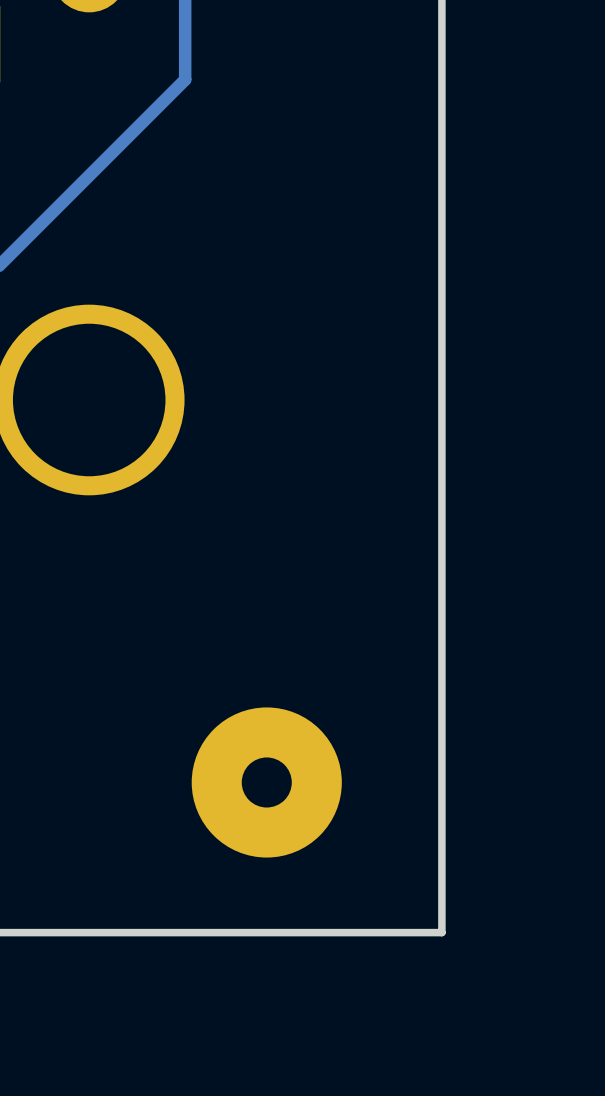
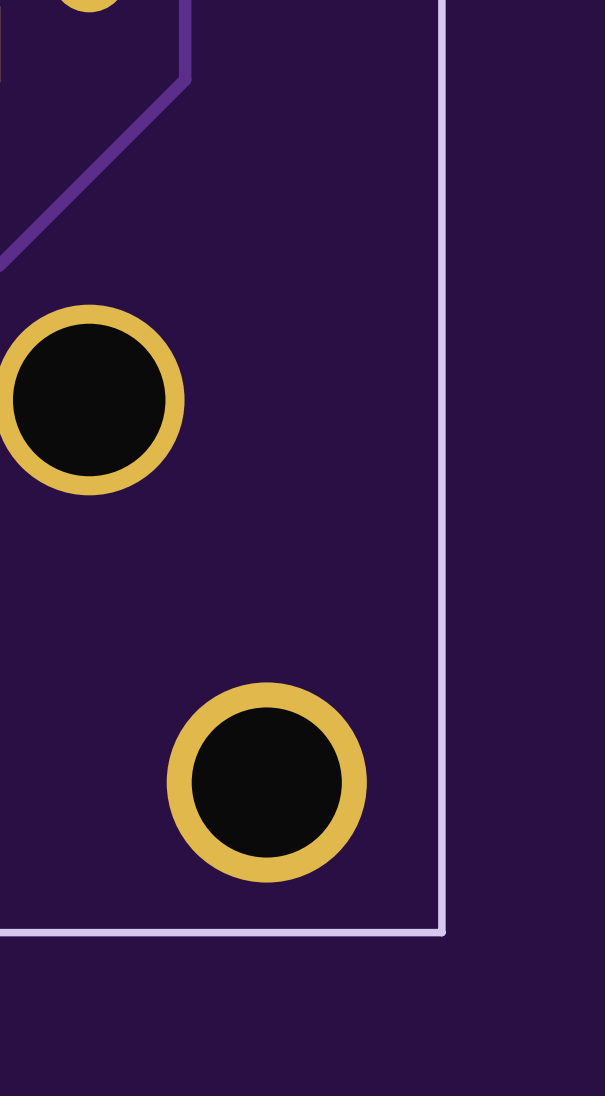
part footprint: [191, 707, 342, 858] -> [166, 682, 367, 883]

